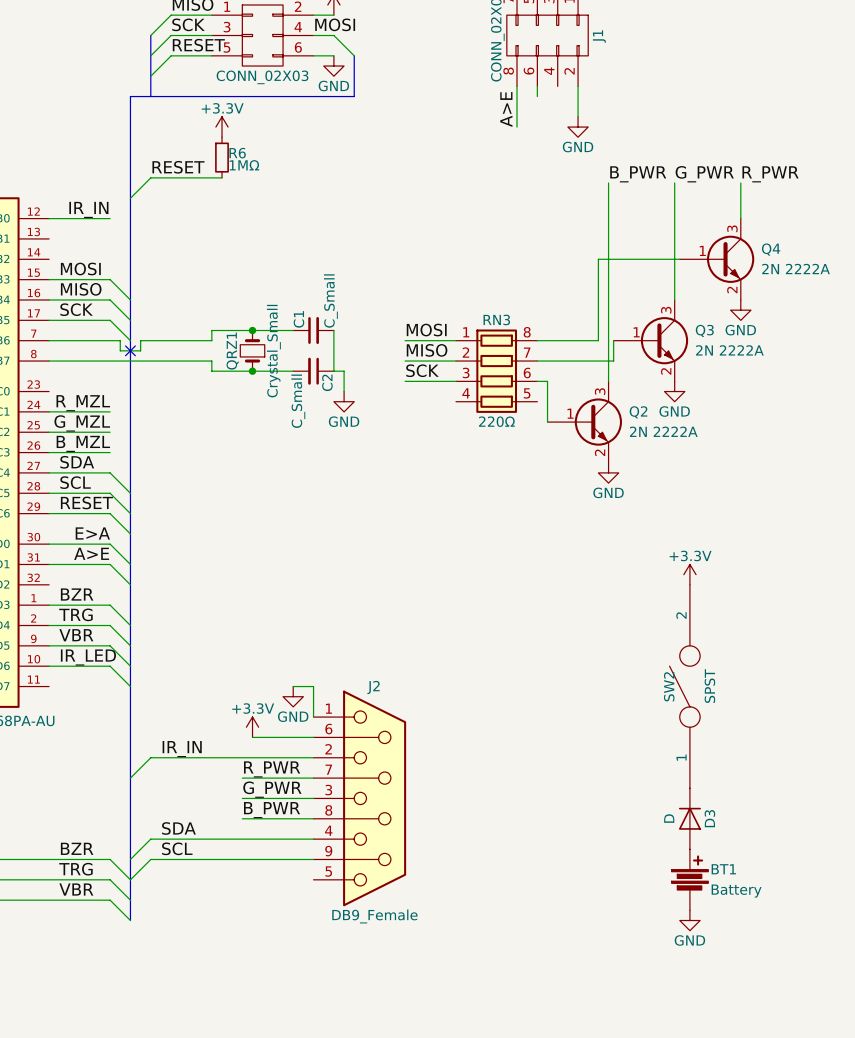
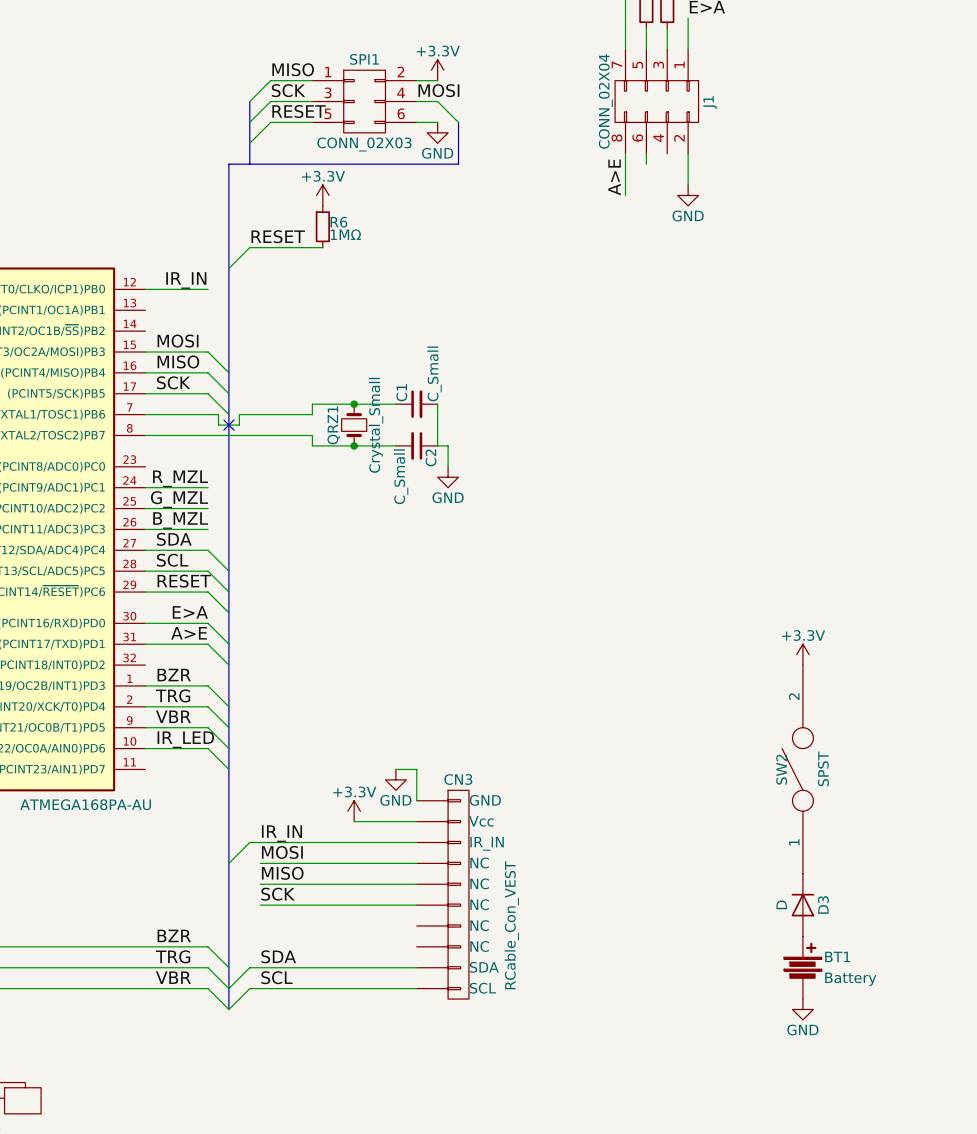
label: B_PWR (638, 174) -> none
label: G_PWR (704, 174) -> none
label: R_PWR (770, 174) -> none
wire: (608, 183) (608, 381) -> none
wire: (674, 183) (674, 299) -> none
wire: (740, 183) (740, 218) -> none
wire: (679, 259) (598, 259) (598, 340) (537, 340) -> none
Q4: 2N 2222A (717, 259) -> none
power symbol: GND (740, 310) -> none
label: MOSI (426, 330) -> none
wire: (405, 340) (455, 340) -> none
wire: (613, 340) (613, 361) (537, 361) -> none
Q3: 2N 2222A (650, 340) -> none
label: MISO (427, 350) -> none
wire: (405, 361) (455, 361) -> none
label: SCK (422, 370) -> none
RN3: 220Ω (496, 371) -> none
wire: (405, 381) (455, 381) -> none
wire: (537, 381) (547, 381) (547, 422) -> none
power symbol: GND (674, 391) -> none
Q2: 2N 2222A (584, 422) -> none
power symbol: GND (608, 472) -> none
label: none -> MOSI (282, 852)
label: R_PWR (272, 769) -> none
wire: none -> (260, 863) (343, 863)
label: none -> MISO (282, 873)
label: G_PWR (272, 789) -> none
wire: none -> (260, 884) (343, 884)
J2: DB9_Female (359, 798) -> none
label: none -> SCK (278, 894)
CN3: none -> RCable_Con_VEST (442, 894)
label: B_PWR (272, 810) -> none
wire: none -> (260, 905) (343, 905)
label position: SDA (178, 828) -> SDA (278, 956)
wire: (313, 839) (150, 839) (130, 859) -> (416, 967) (249, 967) (228, 988)
label position: SCL (177, 848) -> SCL (276, 977)
wire: (313, 859) (150, 859) (130, 879) -> (416, 988) (249, 988) (228, 1009)

